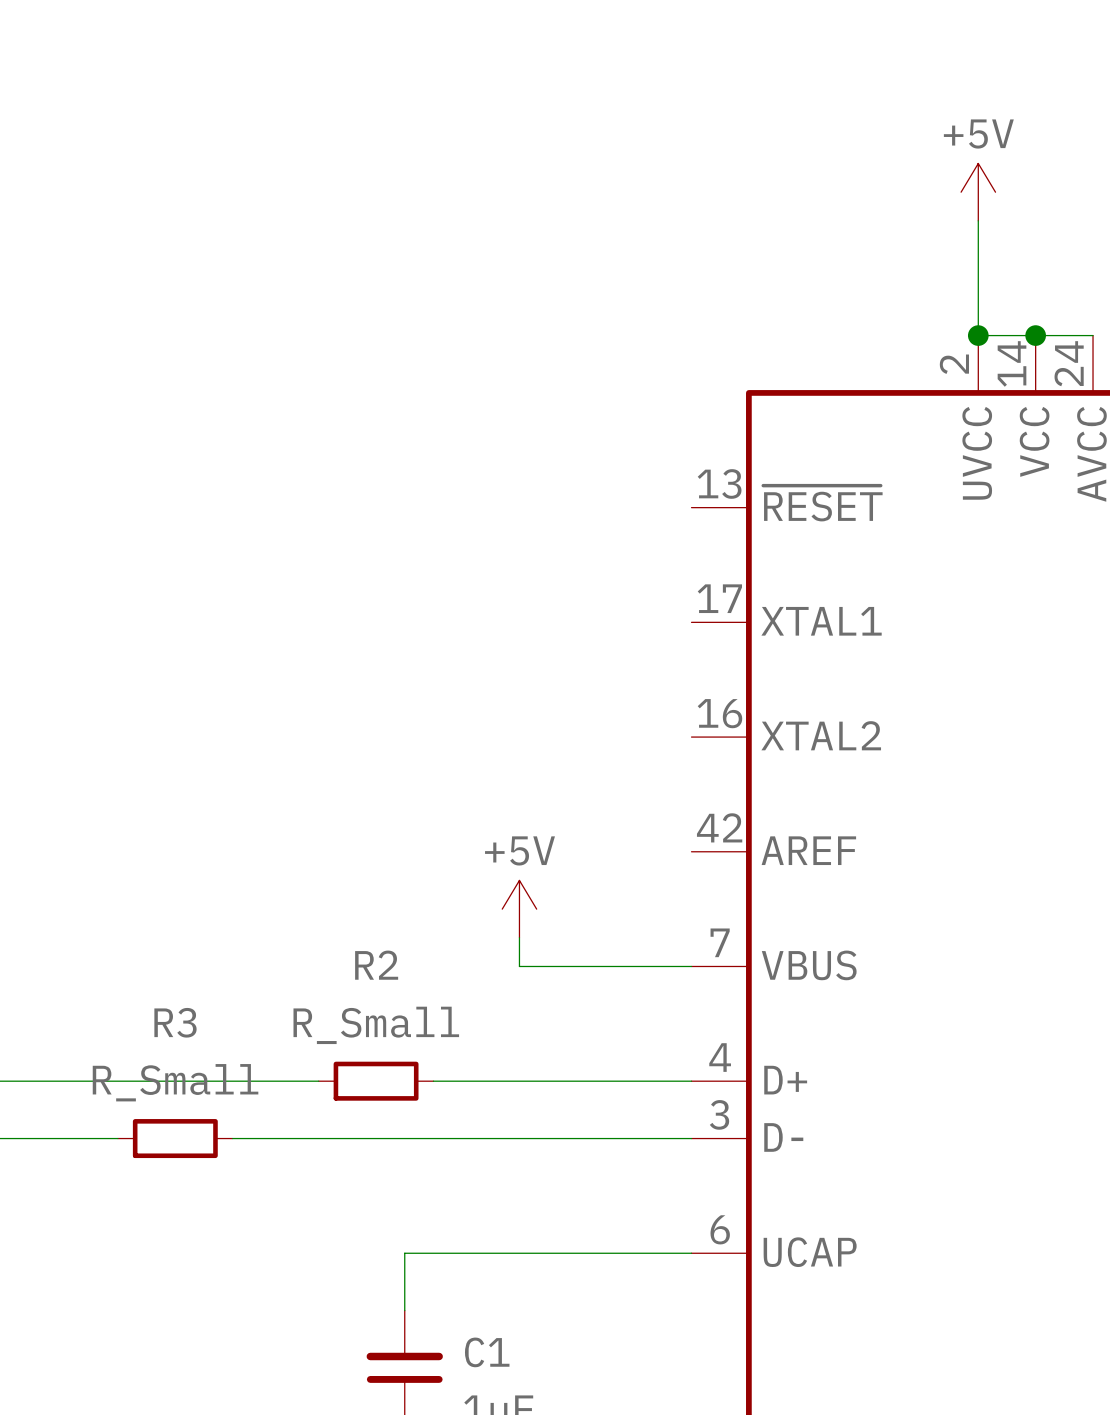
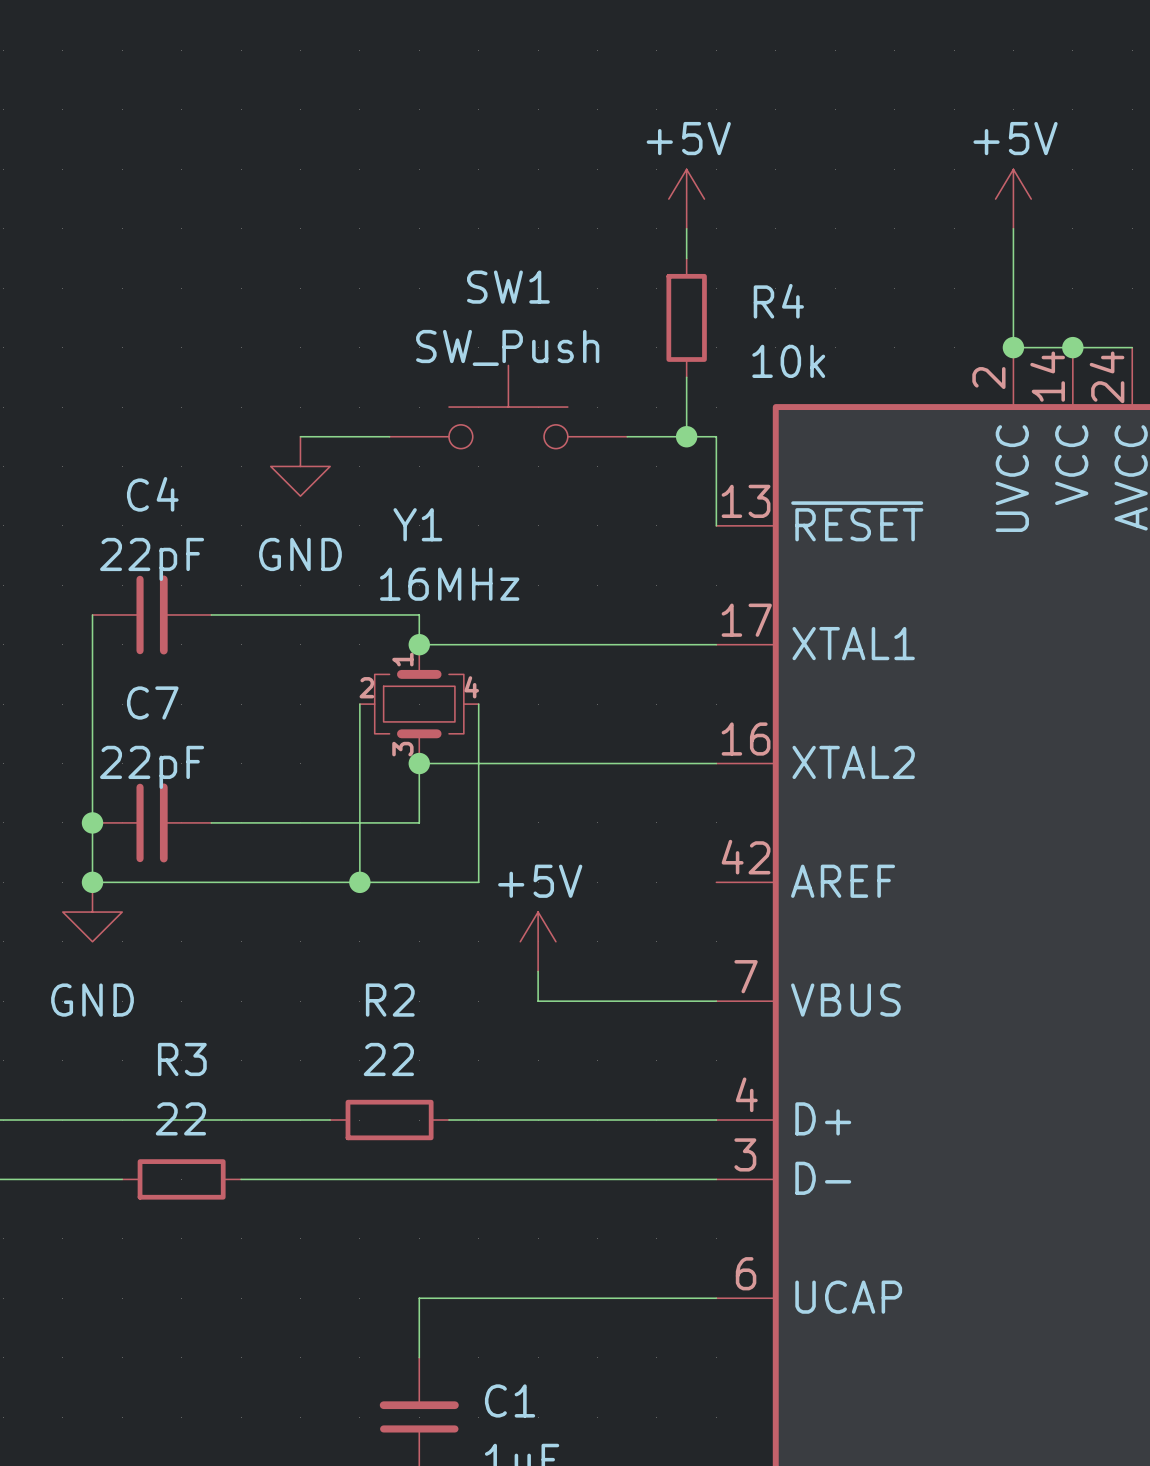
power symbol: none -> +5V (686, 199)
wire: none -> (686, 228) (686, 258)
R4: none -> 10k (686, 317)
wire: none -> (686, 377) (686, 436)
SW1: none -> SW_Push (508, 407)
wire: none -> (300, 436) (389, 436)
wire: none -> (627, 436) (716, 436) (716, 525)
junction: none -> (686, 436)
power symbol: none -> GND (300, 466)
wire: none -> (92, 614) (92, 882) (478, 882) (478, 704)
C4: none -> 22pF (151, 614)
wire: none -> (211, 614) (419, 614) (419, 644) (716, 644)
junction: none -> (419, 644)
wire: none -> (359, 704) (359, 882)
Y1: none -> 16MHz (419, 704)
junction: none -> (419, 763)
wire: none -> (716, 763) (419, 763) (419, 822) (211, 822)
junction: none -> (92, 822)
C7: none -> 22pF (151, 822)
junction: none -> (92, 882)
junction: none -> (359, 882)
power symbol: none -> GND (92, 912)
R2 value: R_Small (376, 1025) -> 22 (388, 1059)
R3 value: R_Small (175, 1082) -> 22 (180, 1118)

